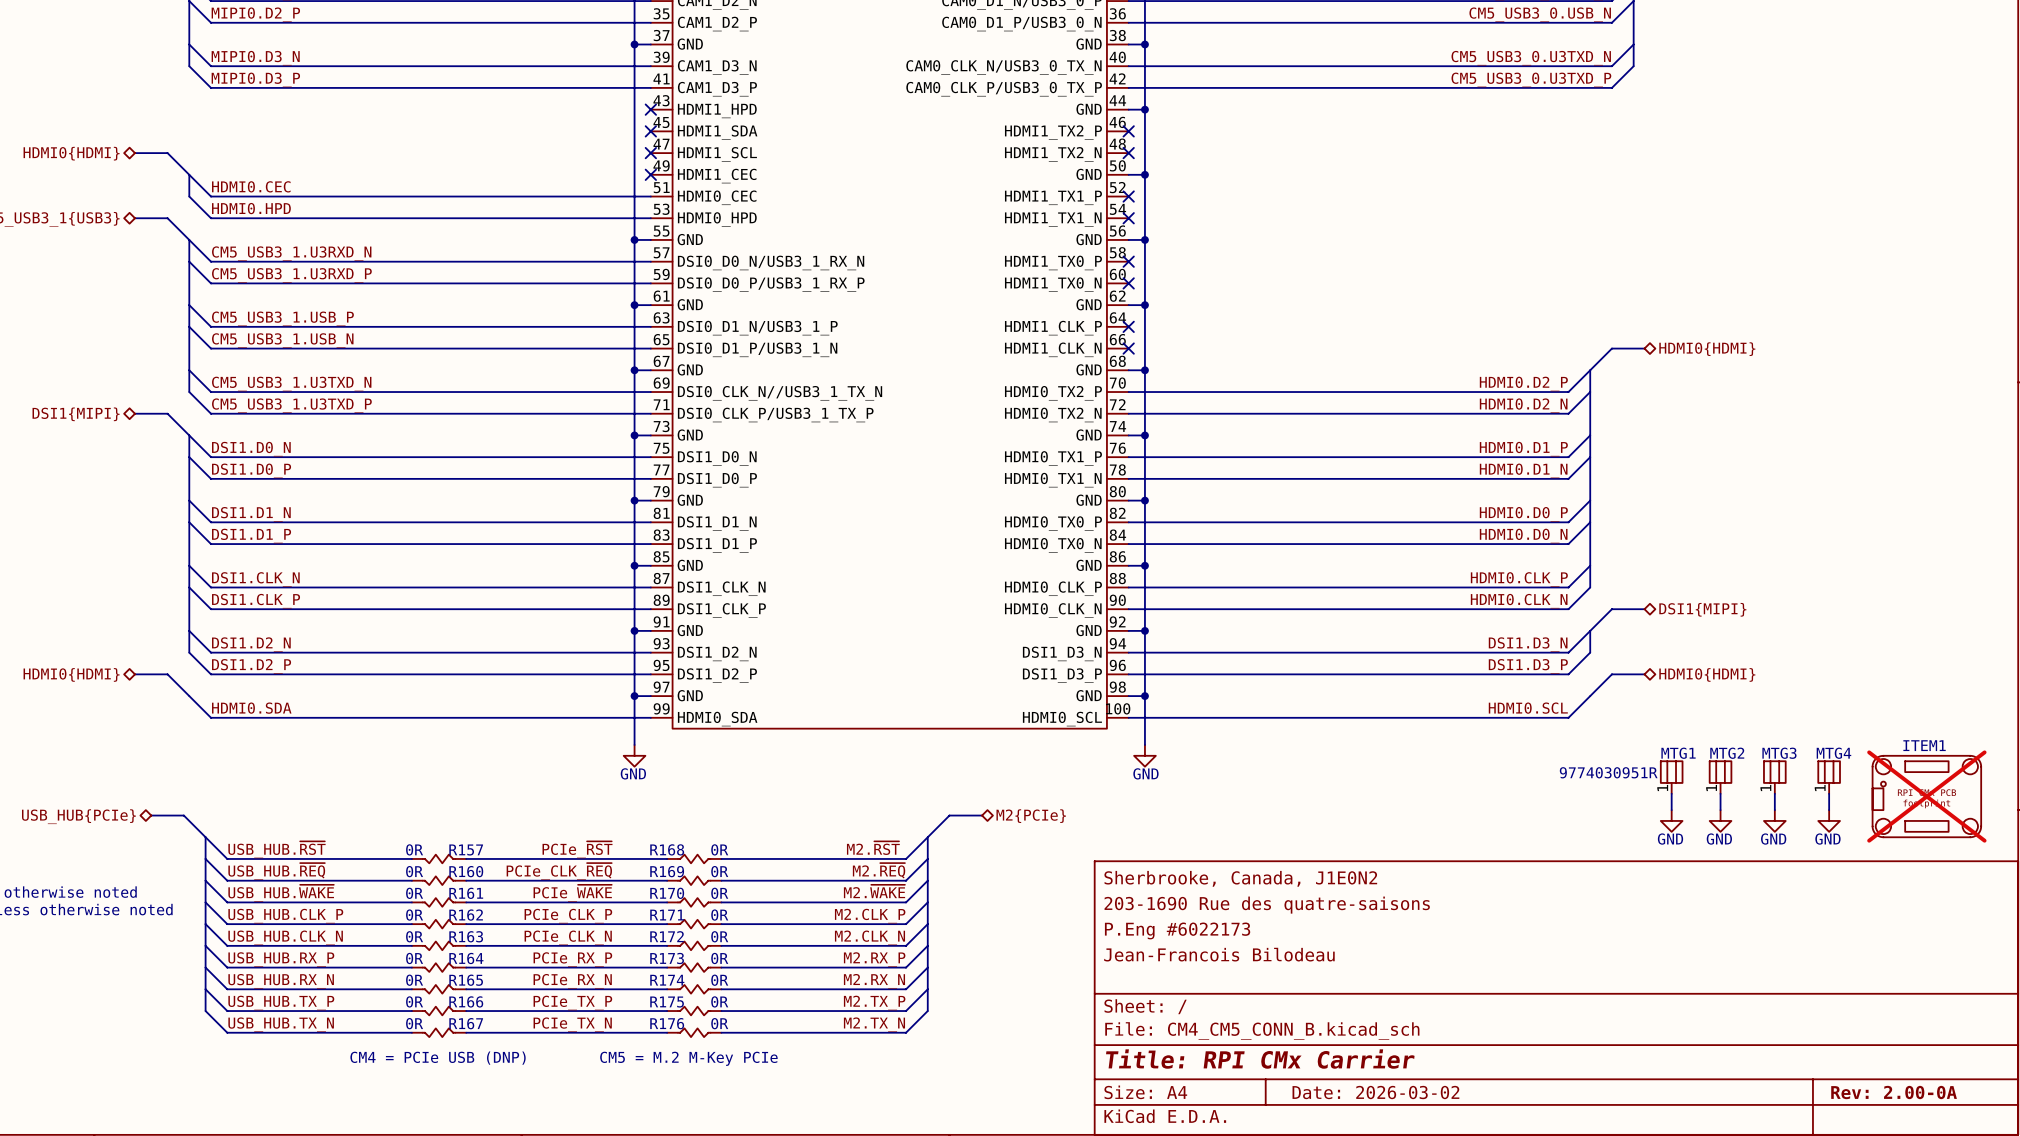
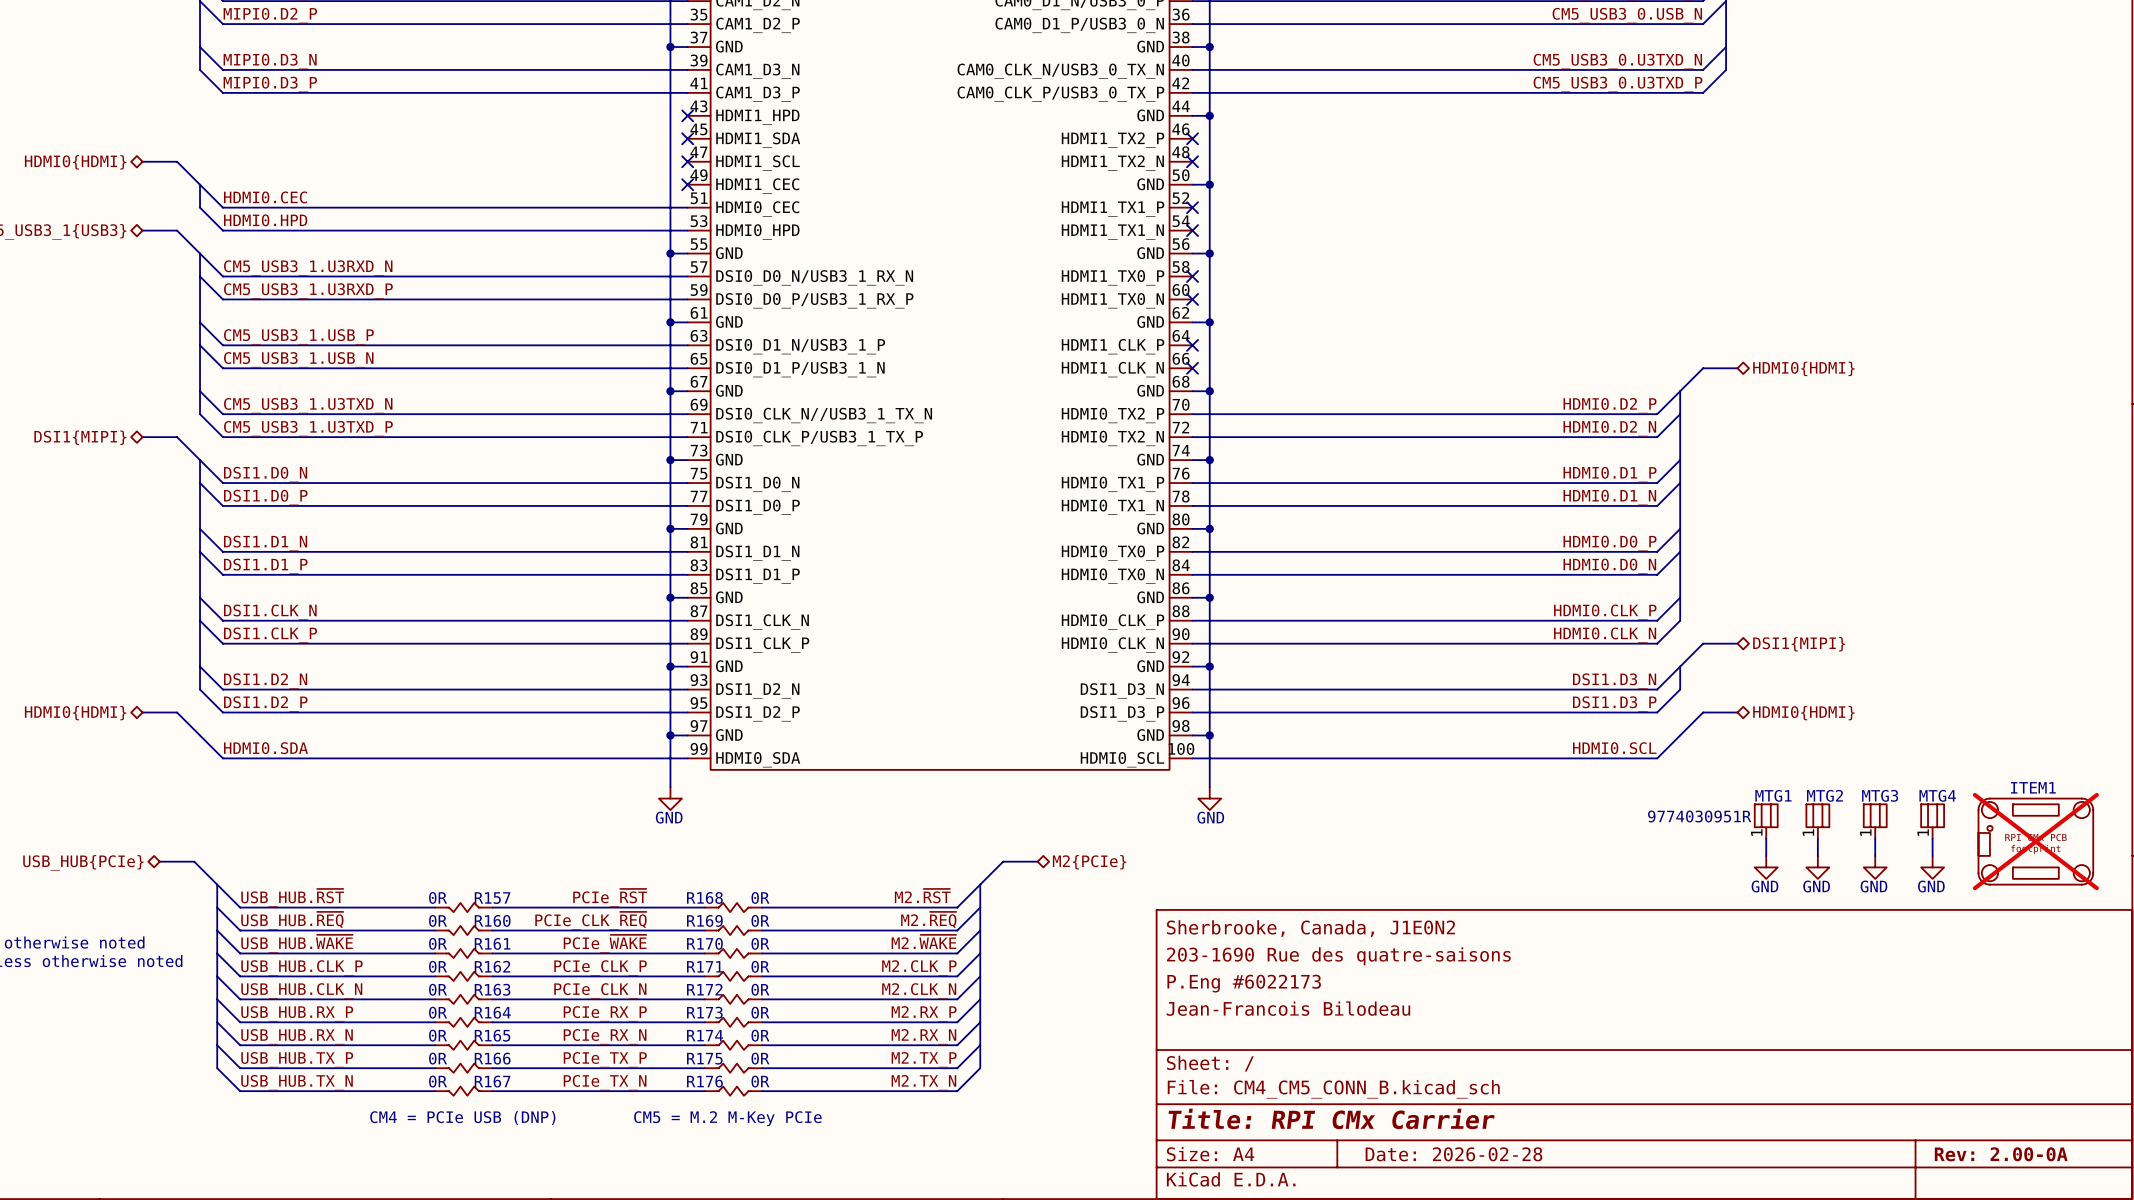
title block: Date: 2026-03-02 (1375, 1092) -> Date: 2026-02-28 (1453, 1154)

